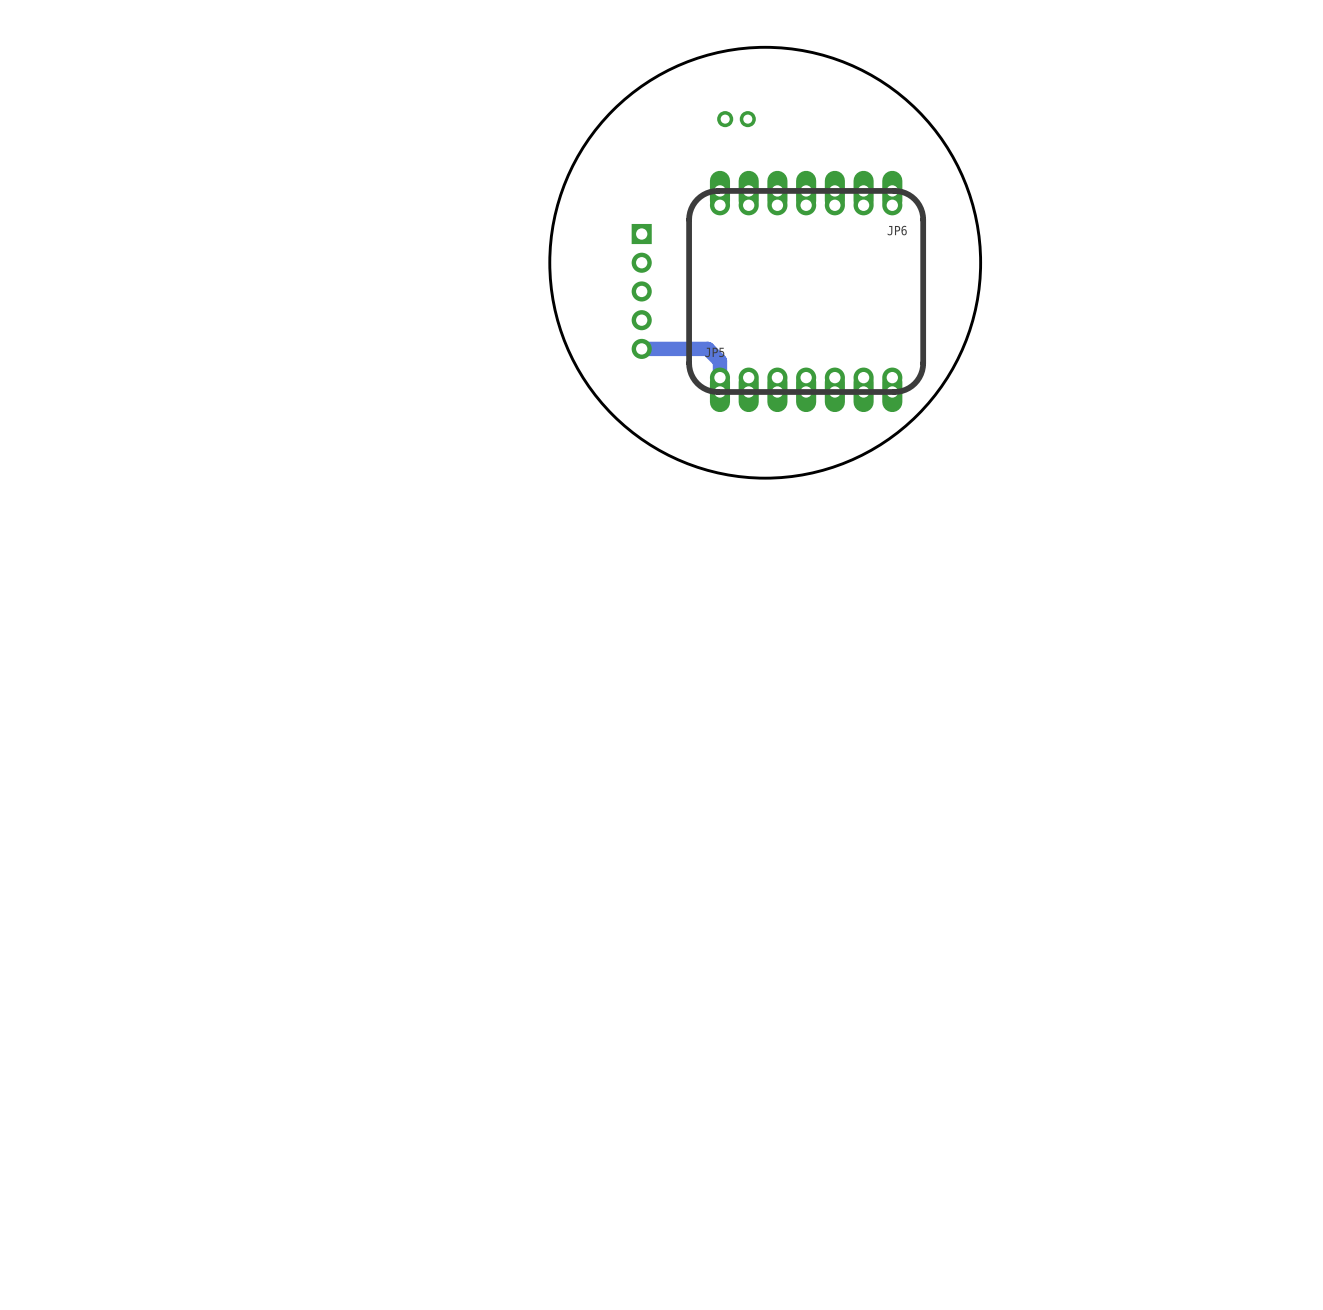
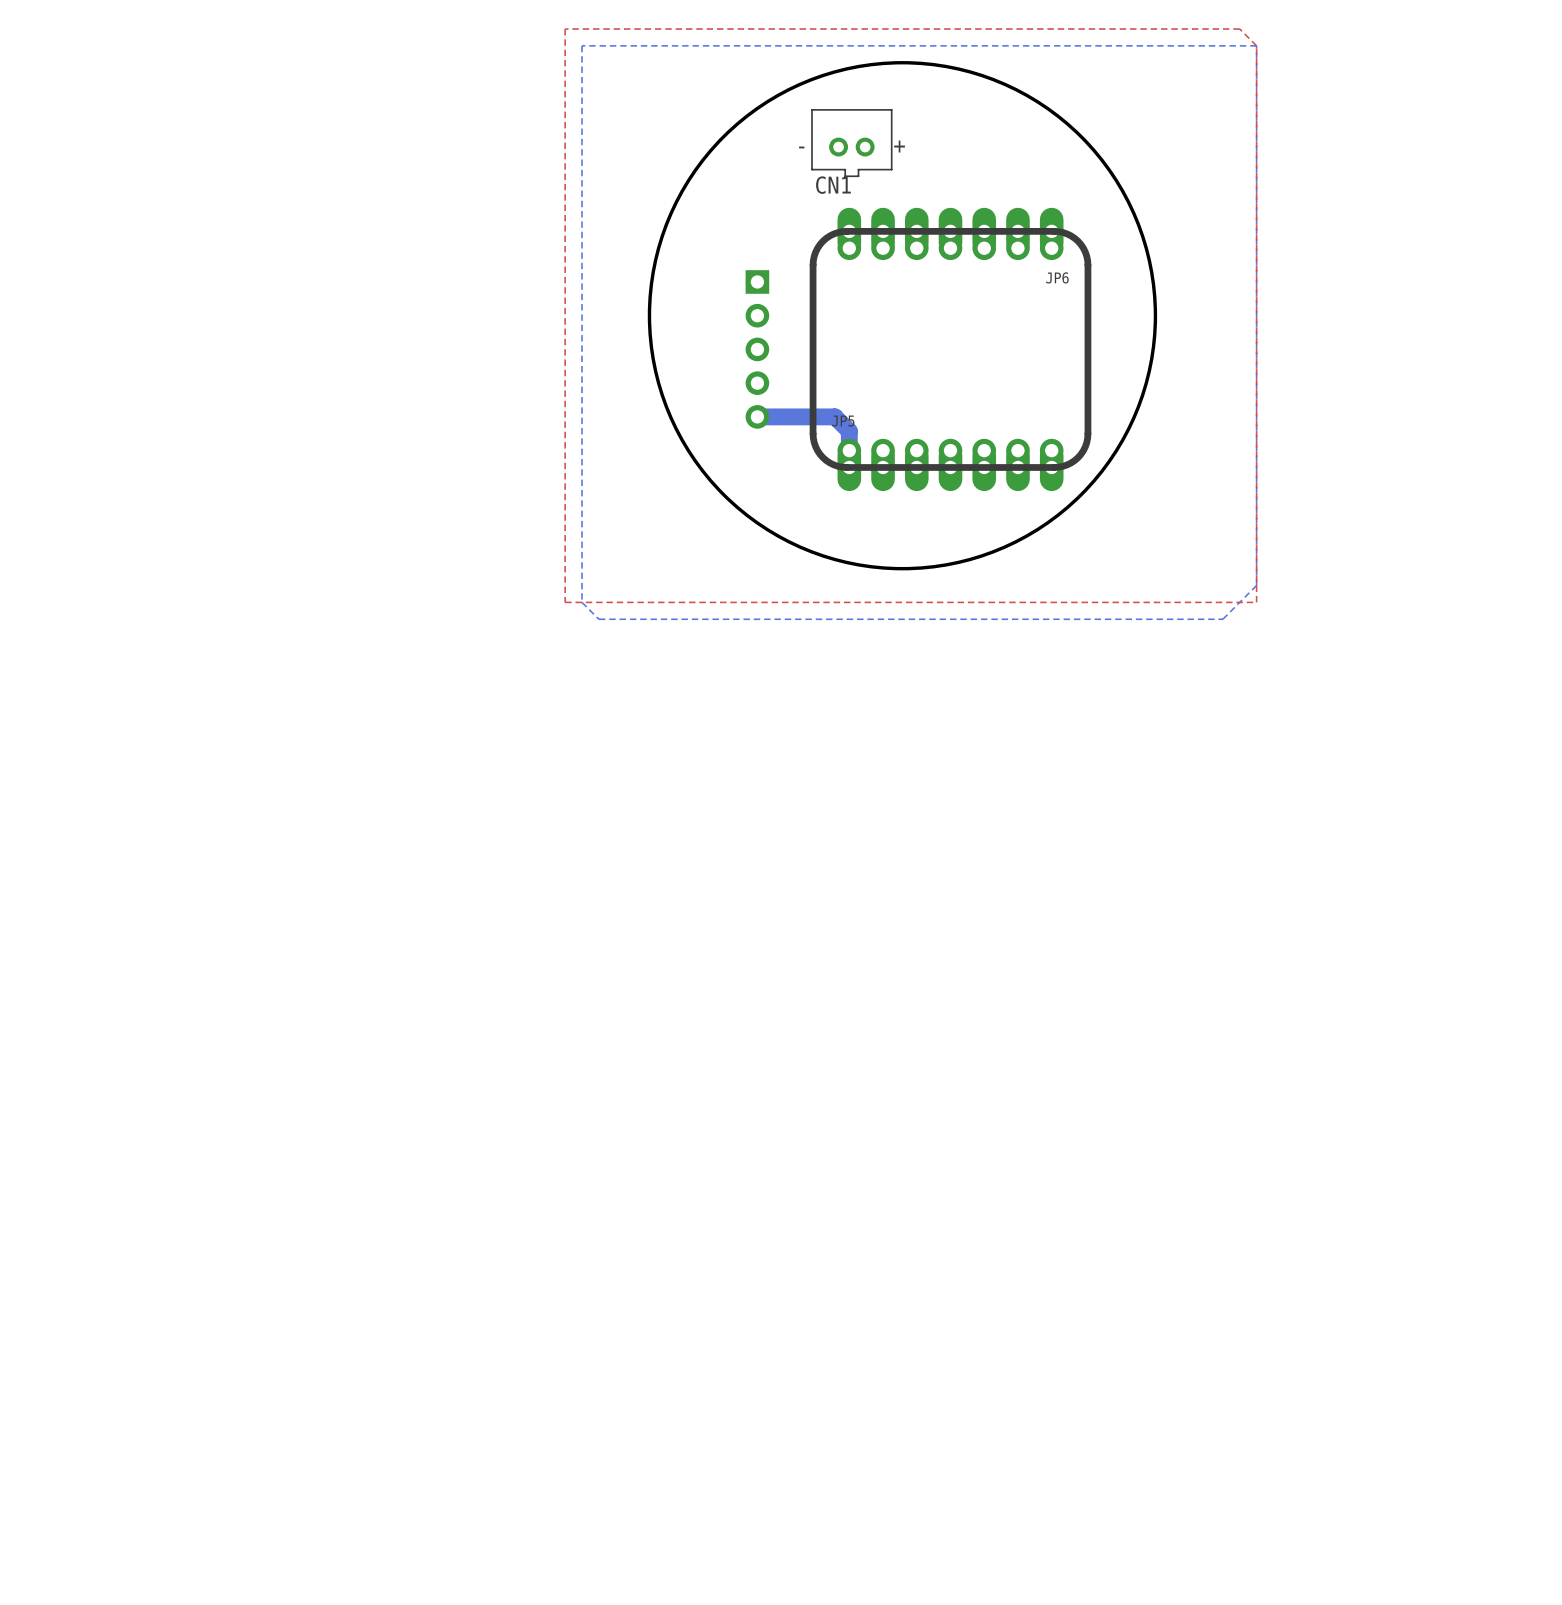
top zone outline: none -> (565, 29) (565, 602) (1256, 602) (1256, 45) (1239, 29) (565, 29)
bottom zone outline: none -> (582, 45) (582, 602) (598, 619) (1222, 619) (1256, 585) (1256, 45) (582, 45)
CN1 side: bottom (736, 119) -> top (851, 143)

